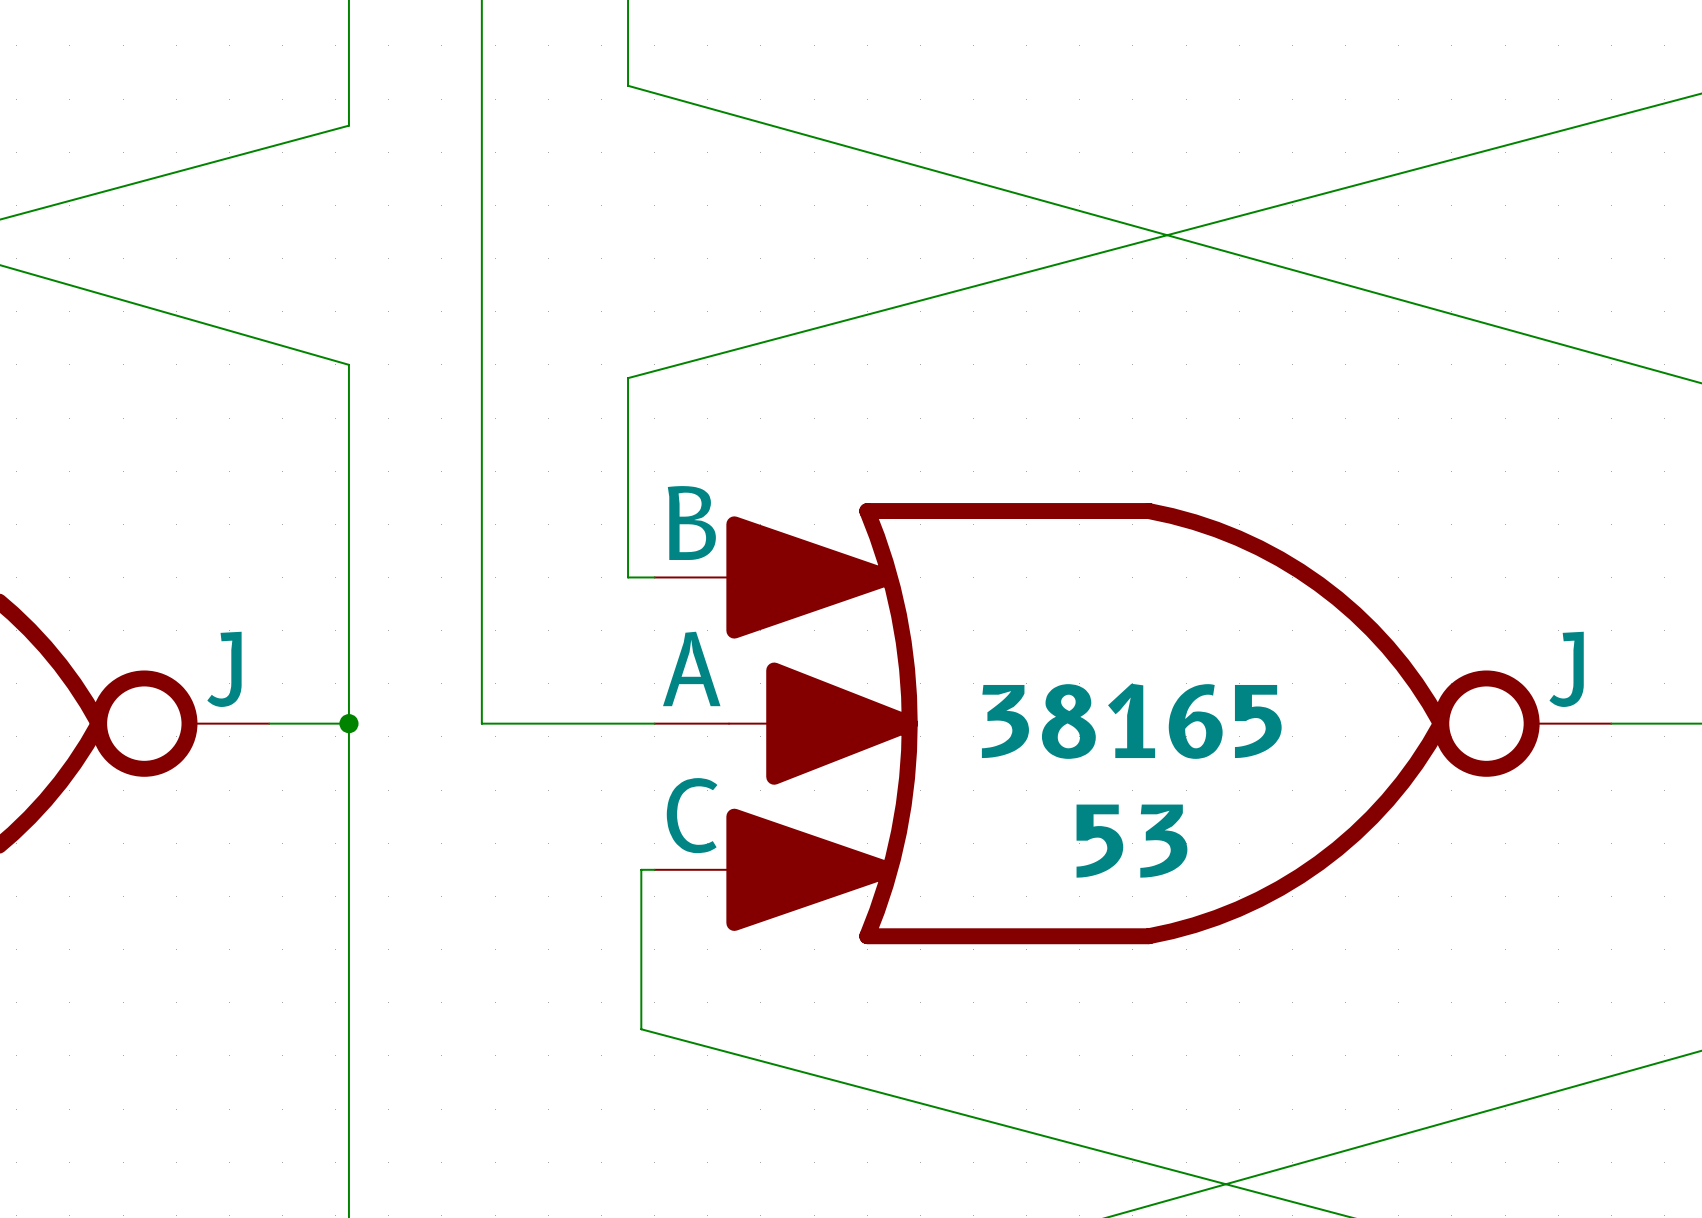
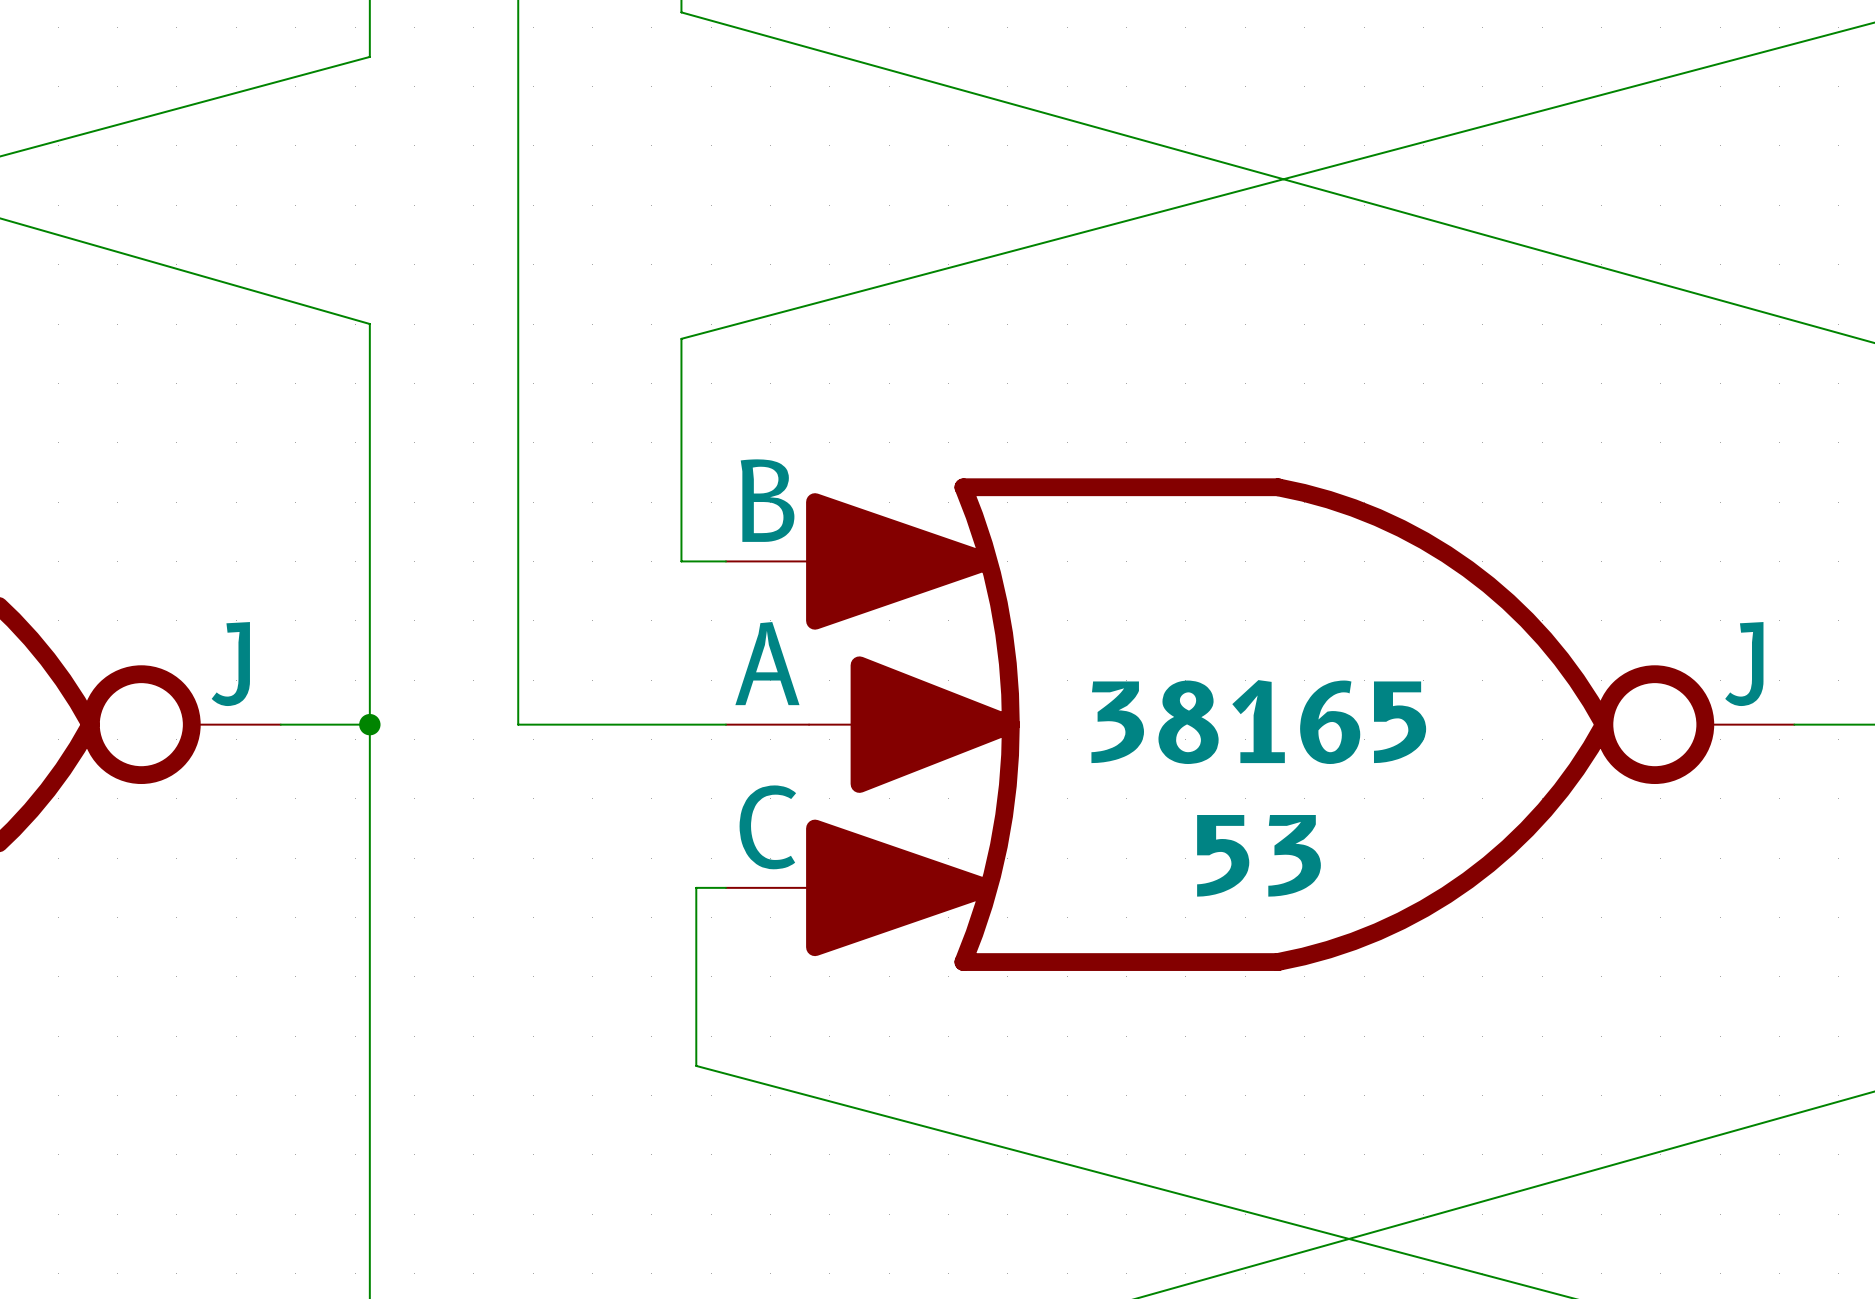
part position: (1132, 723) -> (1260, 724)

